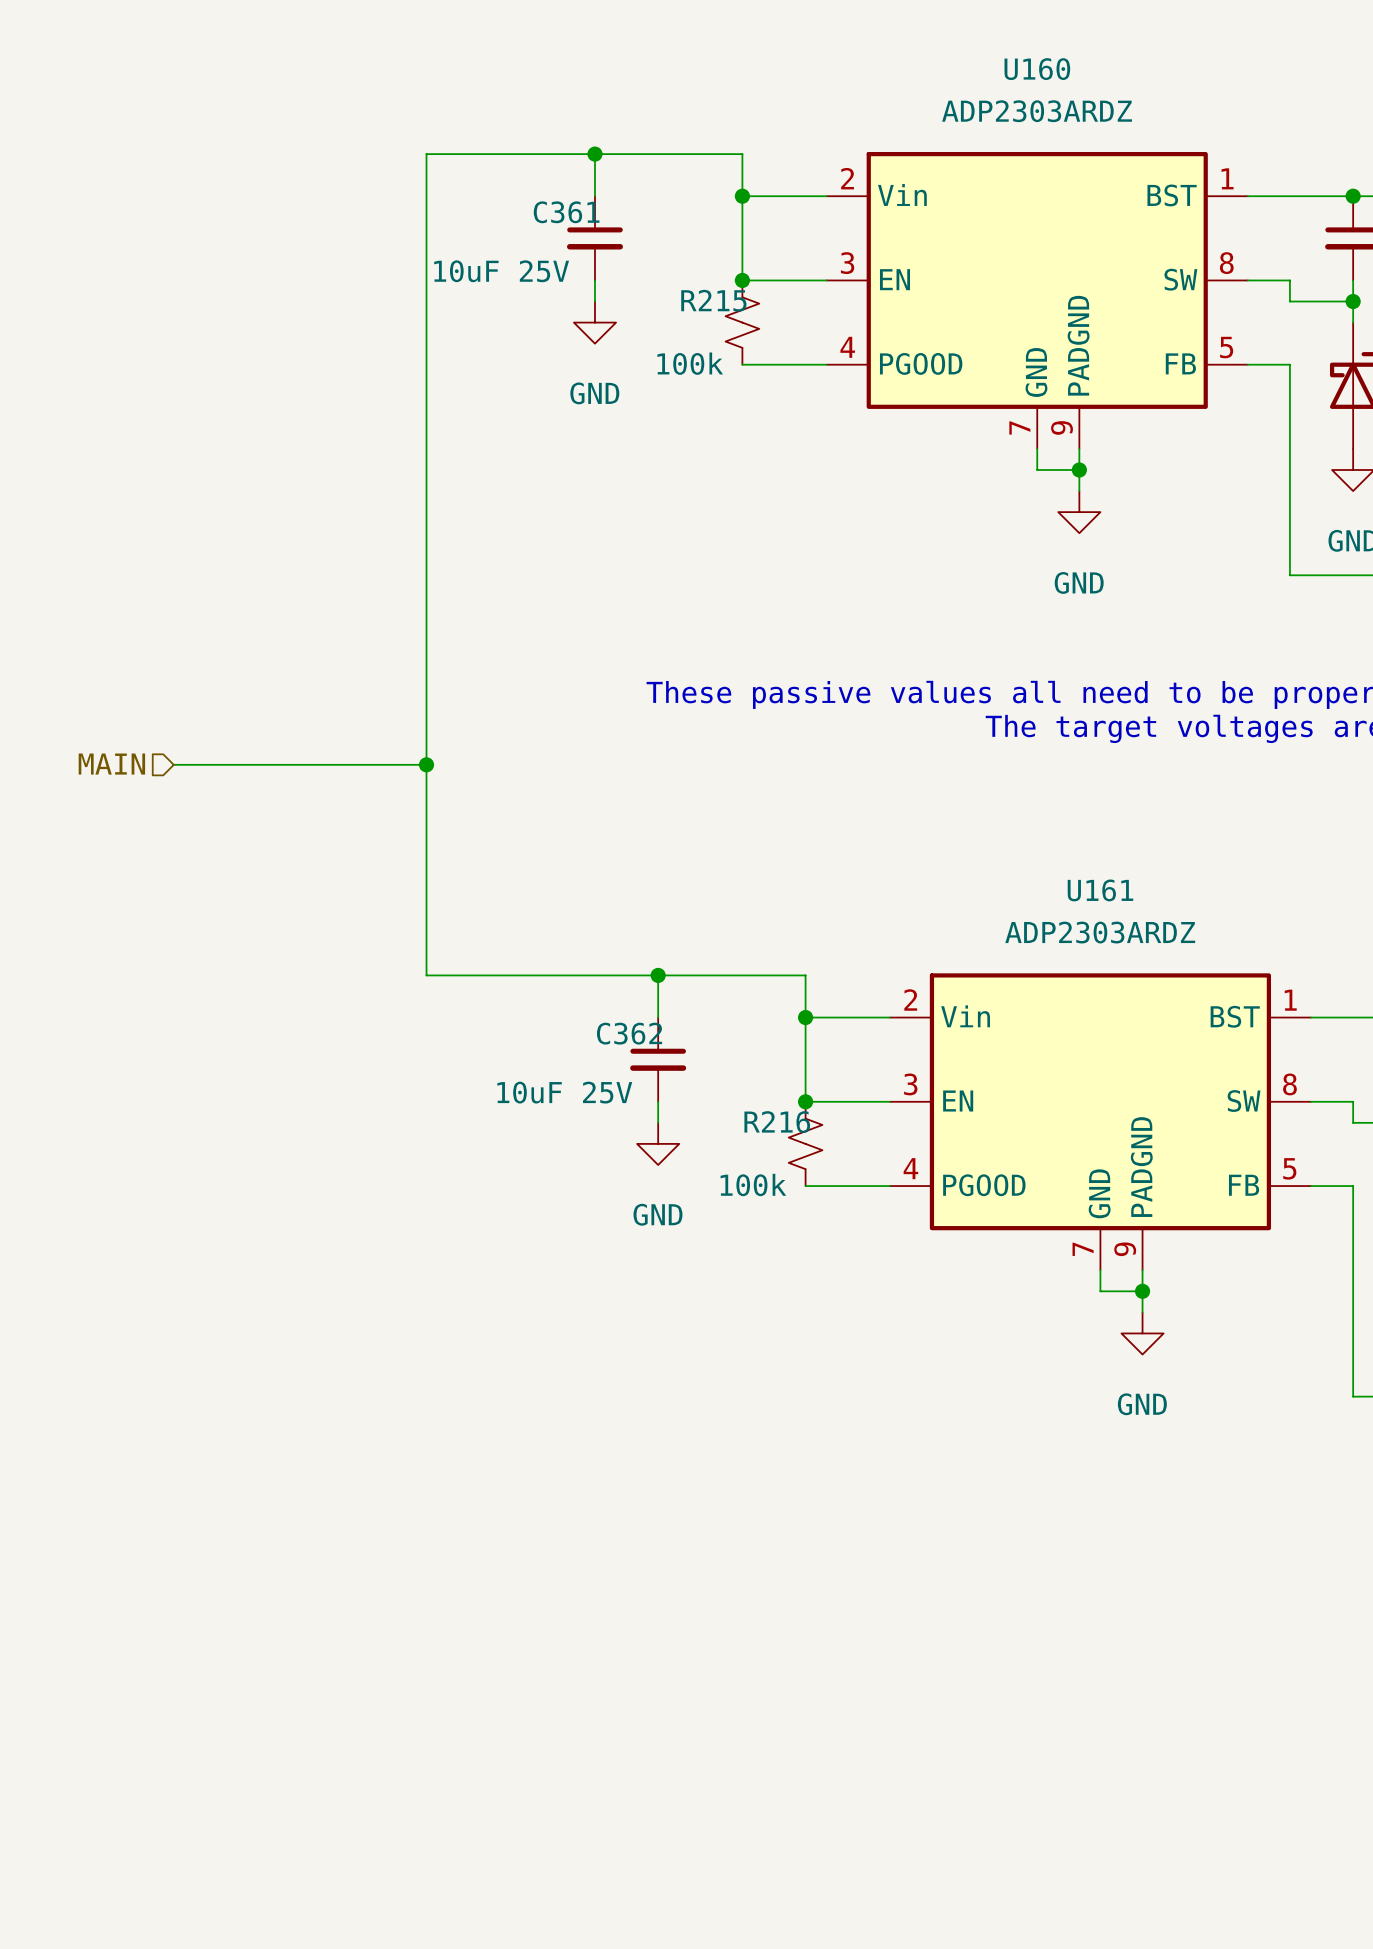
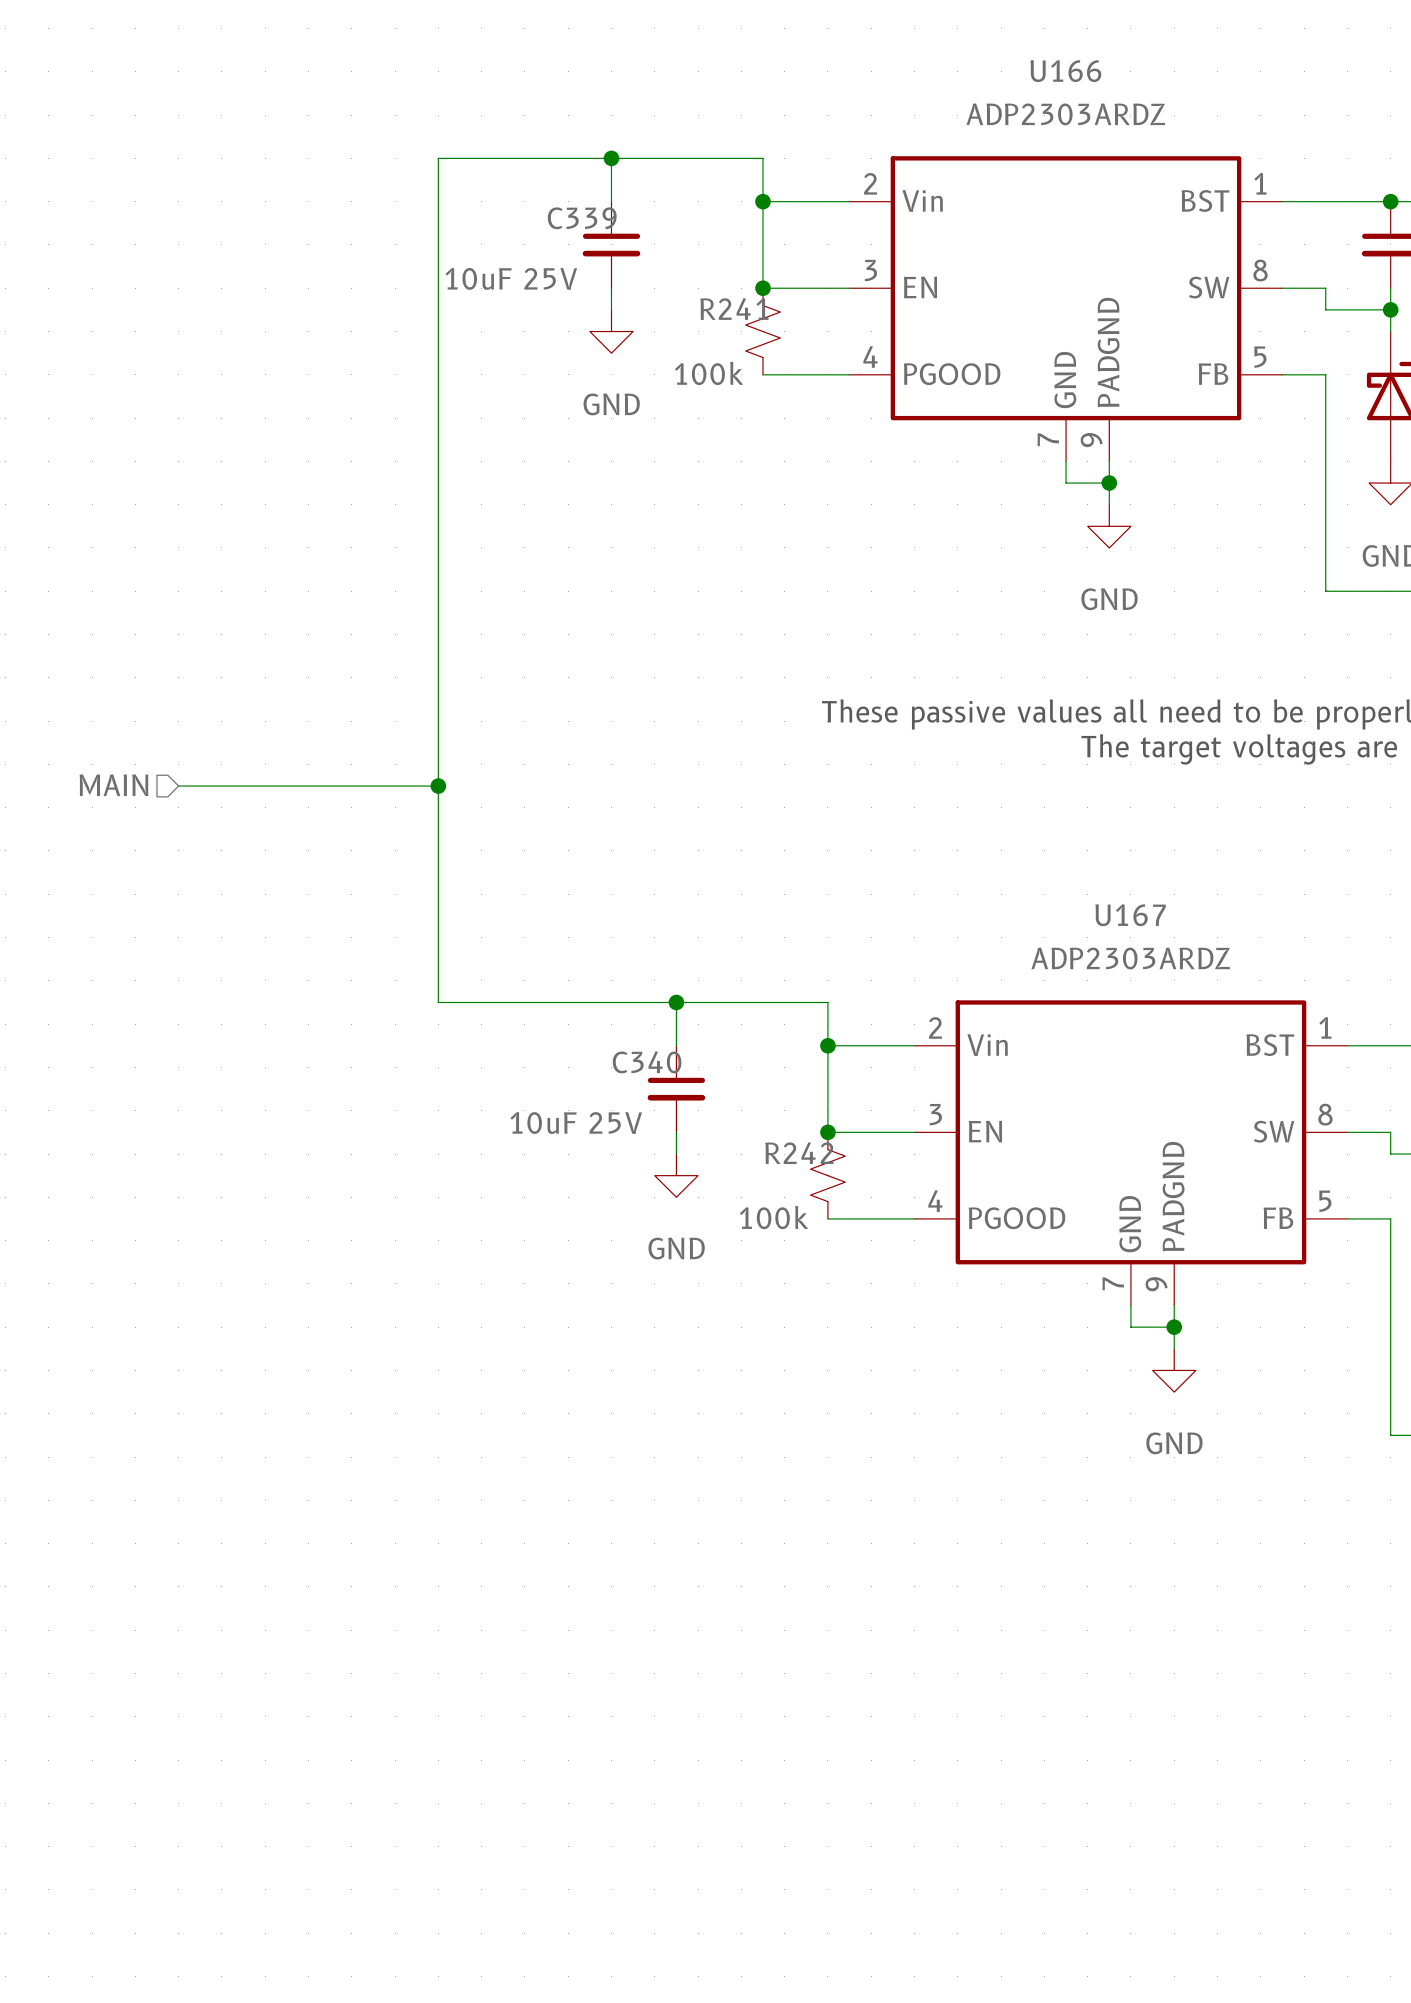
U160 name: U160 (1037, 69) -> U166 (1065, 71)
C361 name: C361 (566, 212) -> C339 (582, 218)
R215 name: R215 (713, 300) -> R241 (734, 309)
U161 name: U161 (1100, 890) -> U167 (1130, 915)
C362 name: C362 (629, 1033) -> C340 (647, 1062)
R216 name: R216 (777, 1122) -> R242 (799, 1153)

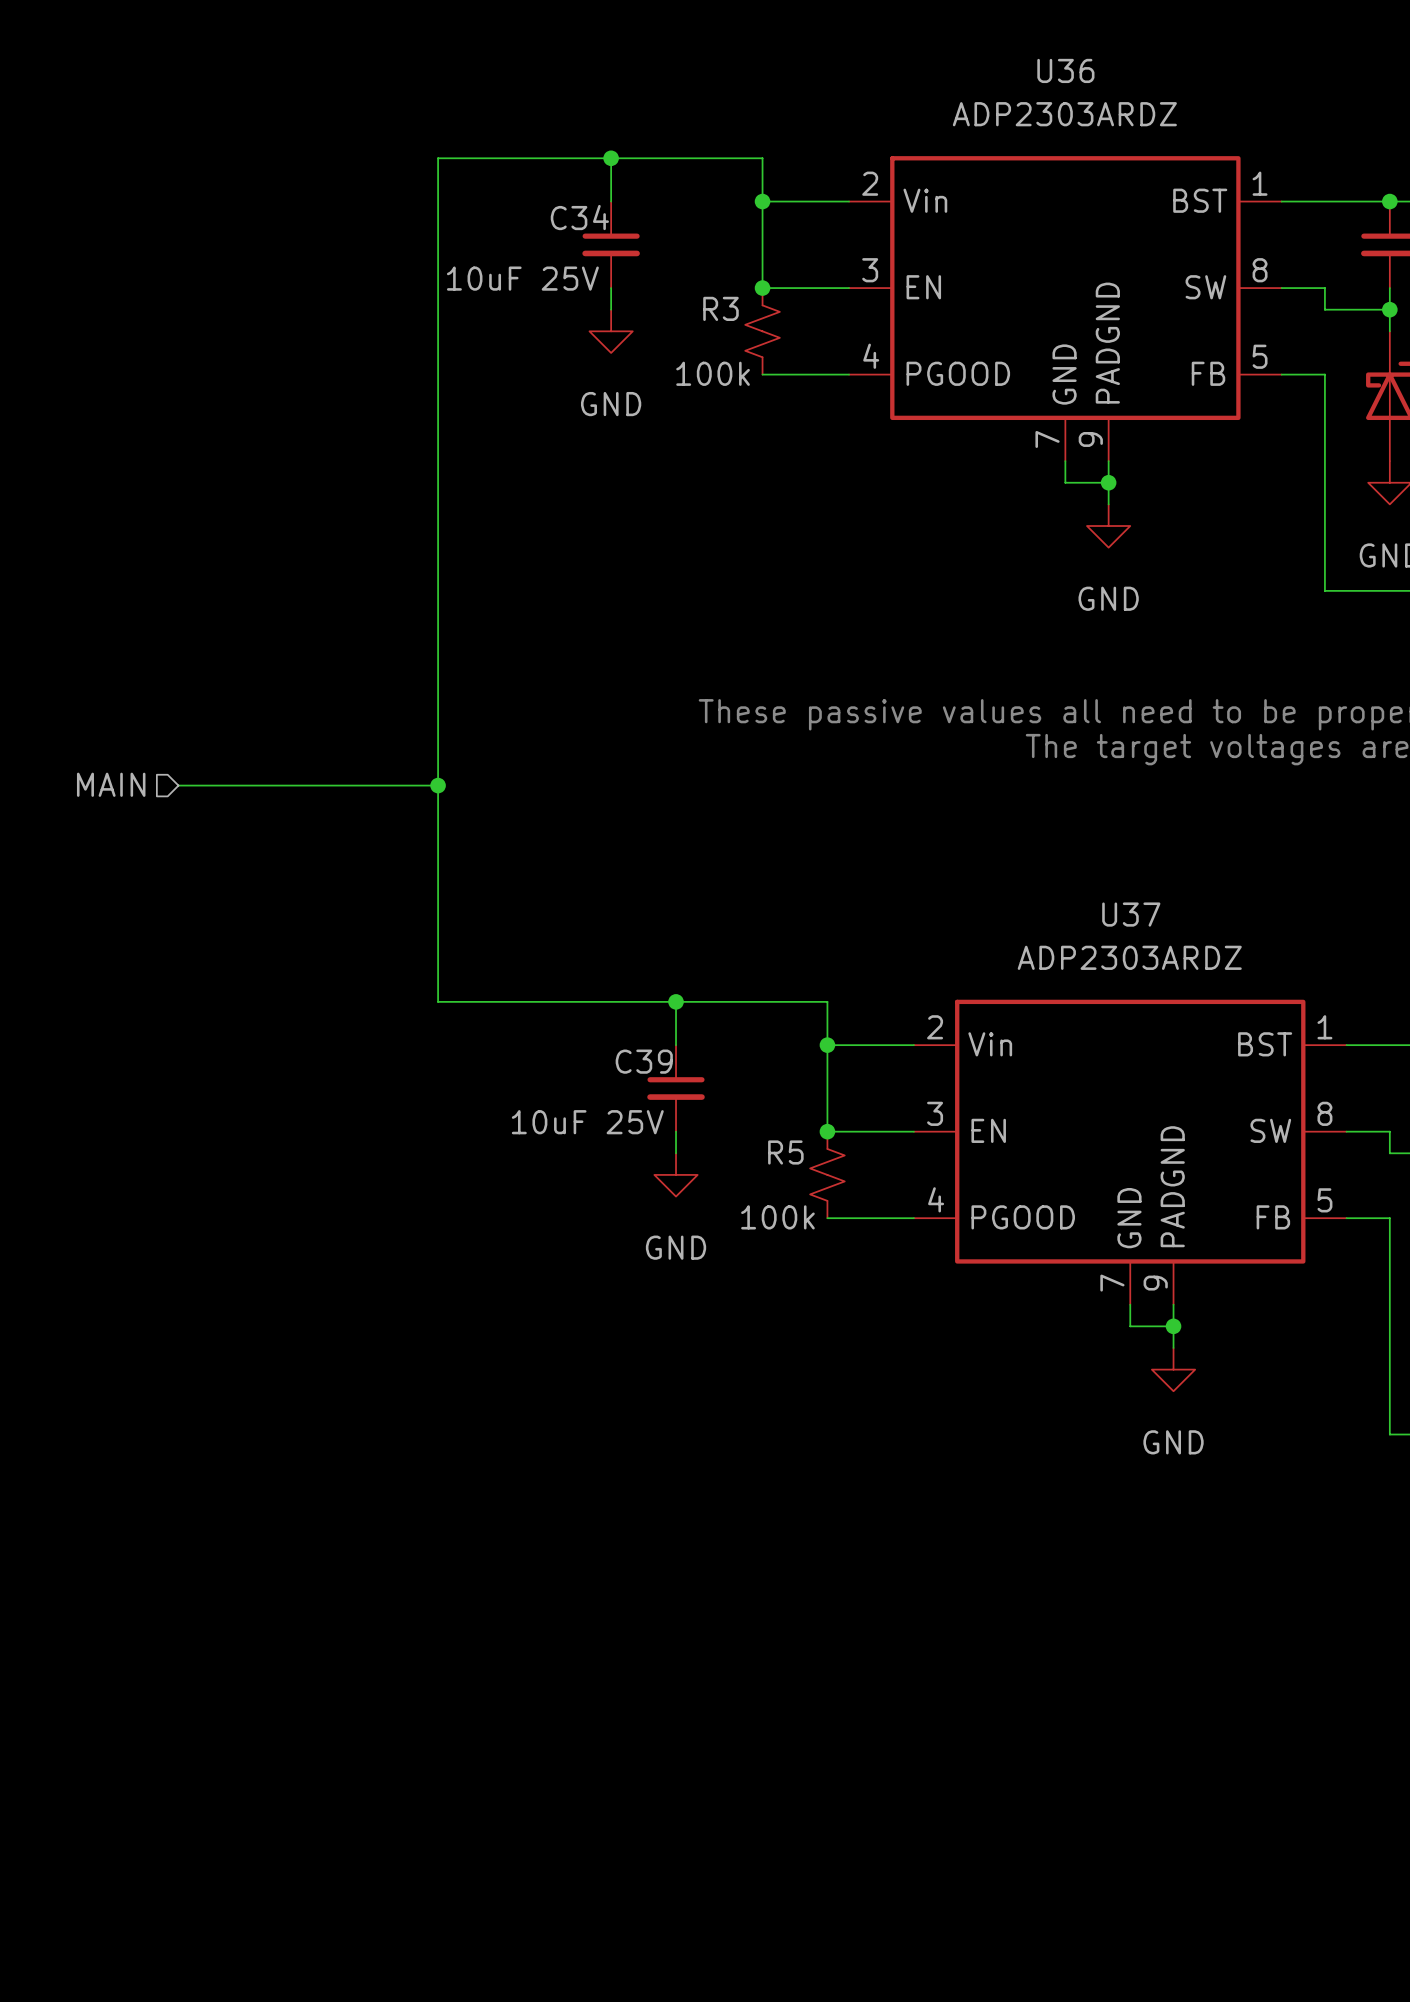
U166 name: U166 (1065, 71) -> U36 (1065, 70)
C339 name: C339 (582, 218) -> C34 (579, 217)
R241 name: R241 (734, 309) -> R3 (720, 308)
U167 name: U167 (1130, 915) -> U37 (1131, 914)
C340 name: C340 (647, 1062) -> C39 (644, 1061)
R242 name: R242 (799, 1153) -> R5 (785, 1152)

